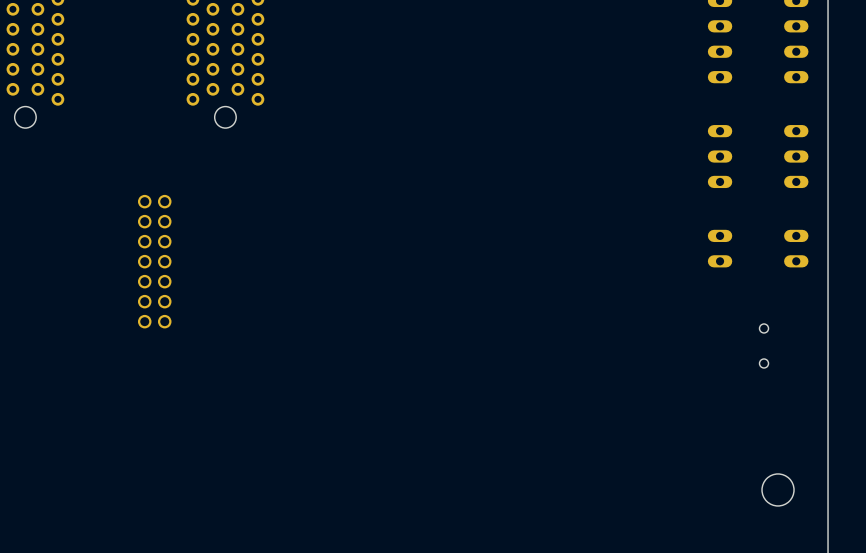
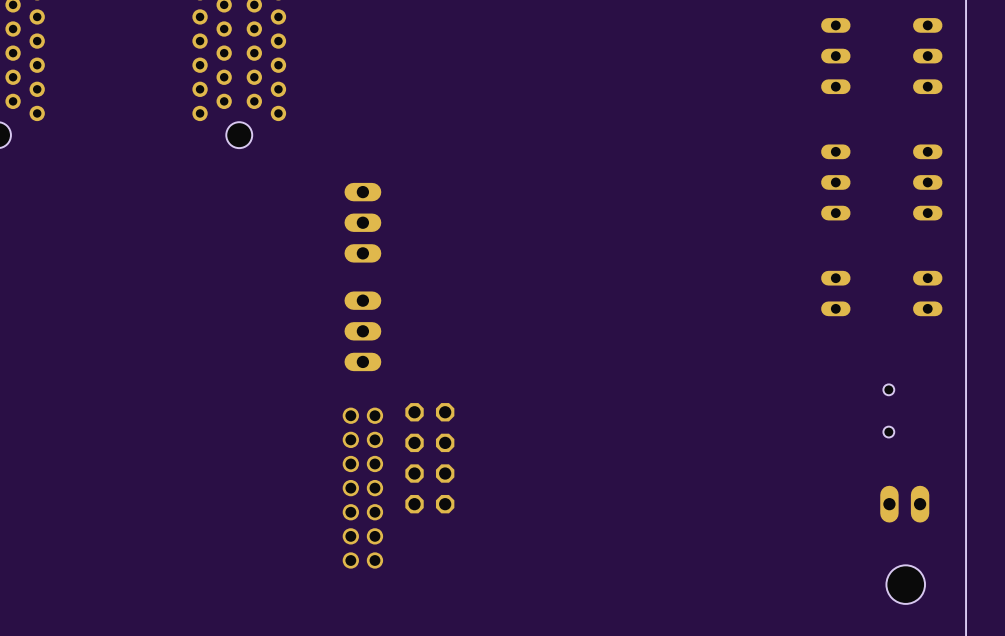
part: none -> (362, 222)
part position: (154, 261) -> (362, 488)
part: none -> (362, 331)
part: none -> (429, 458)
part: none -> (904, 504)

